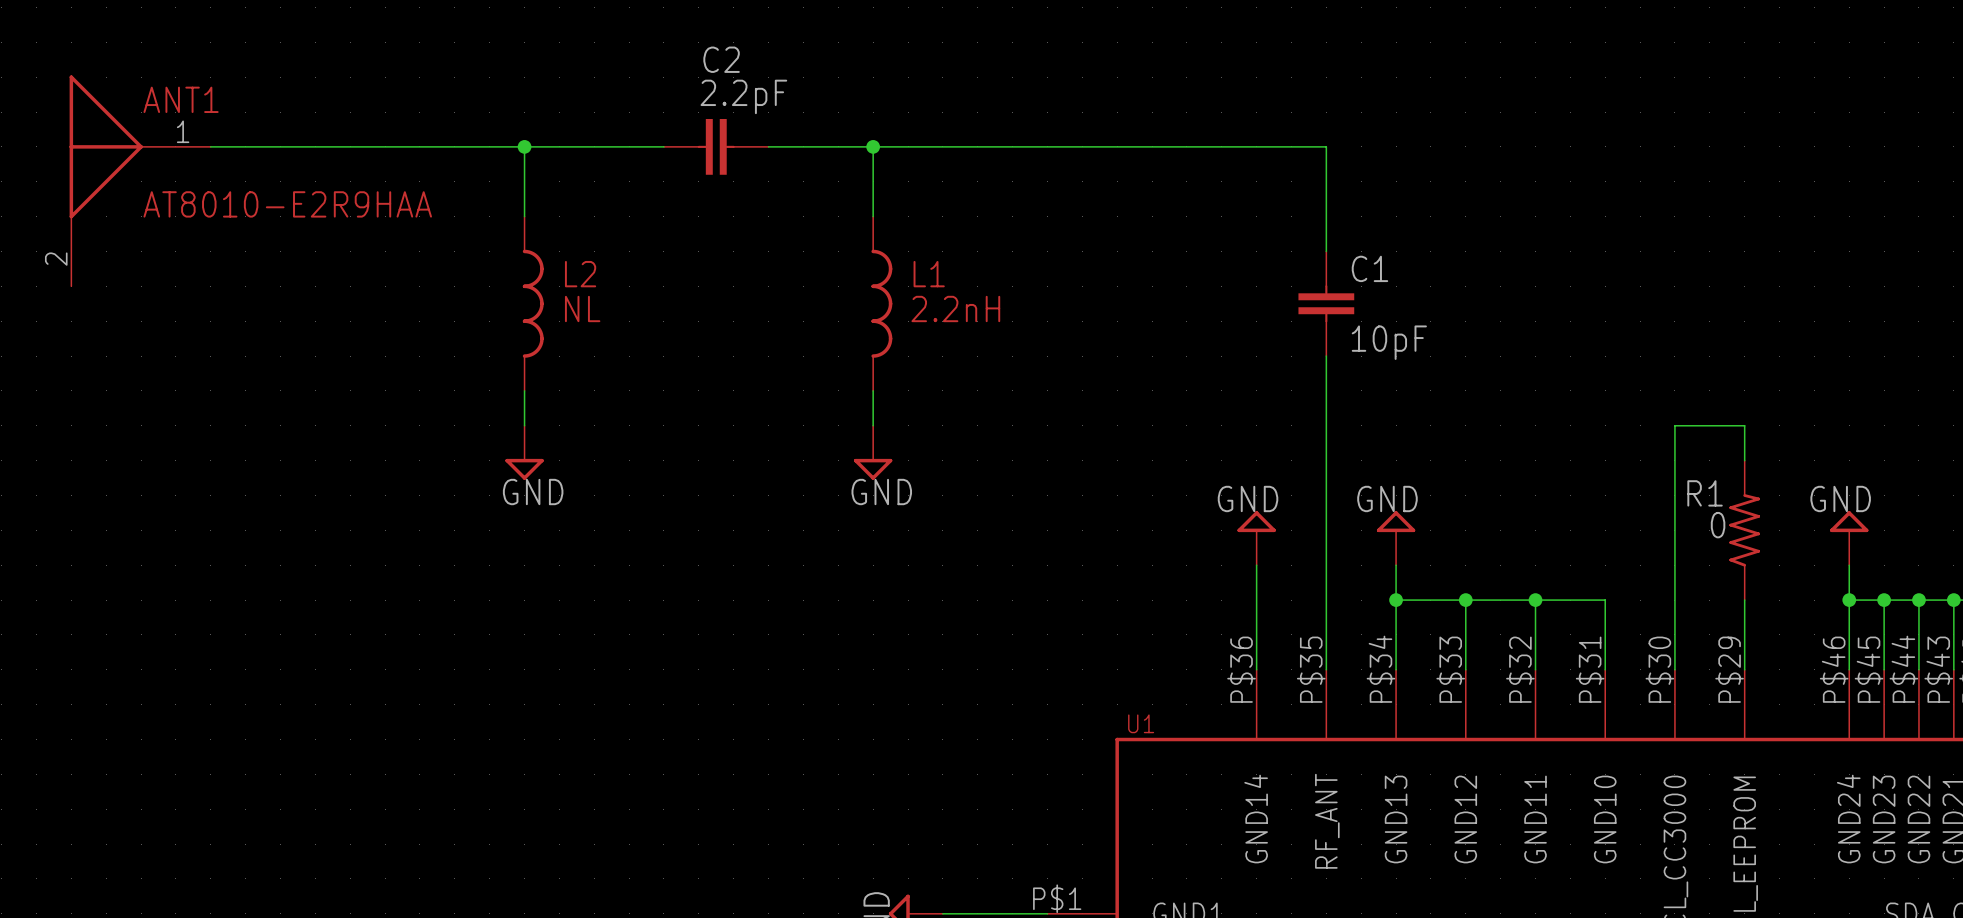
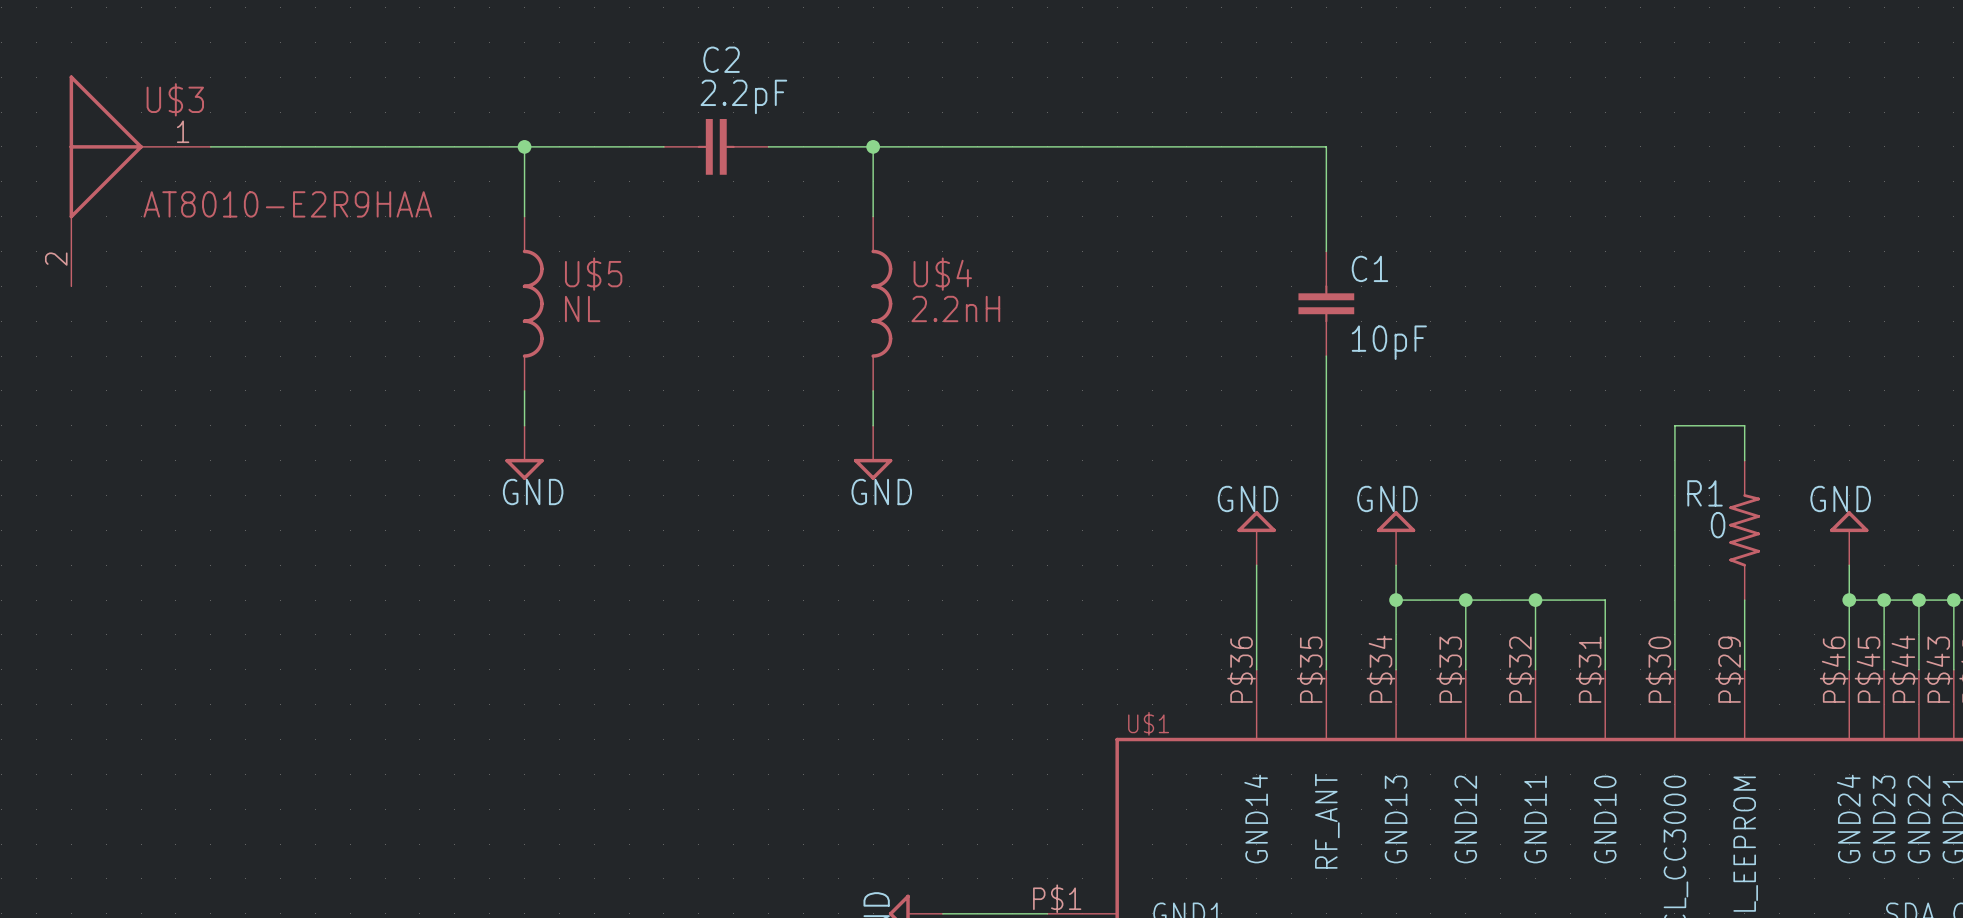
ANT1 name: ANT1 (181, 99) -> U$3 (175, 99)
L2 name: L2 (580, 274) -> U$5 (593, 274)
L1 name: L1 (929, 274) -> U$4 (942, 274)
U1 name: U1 (1141, 723) -> U$1 (1148, 723)

